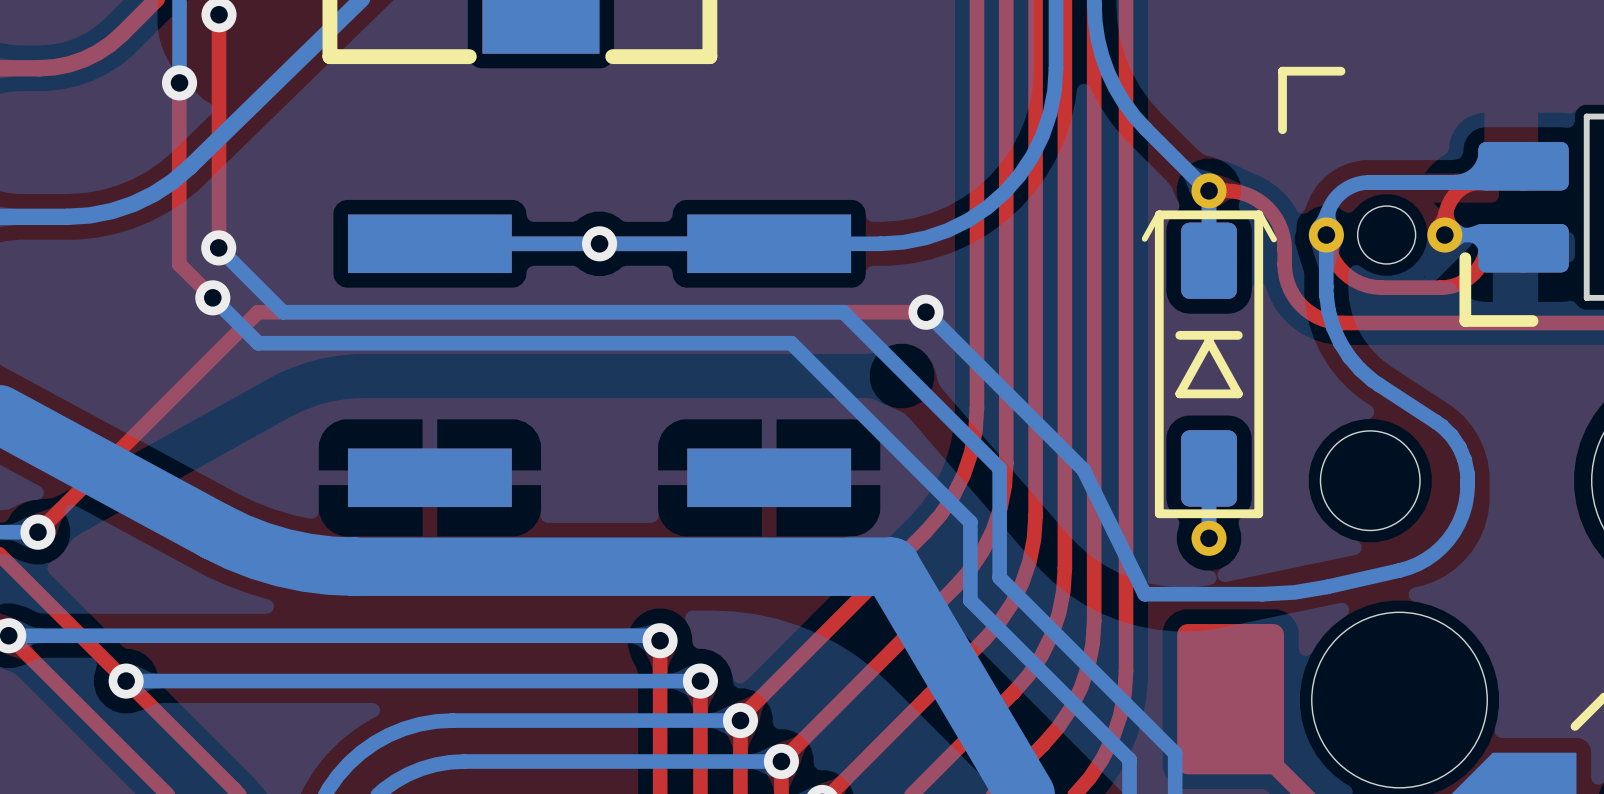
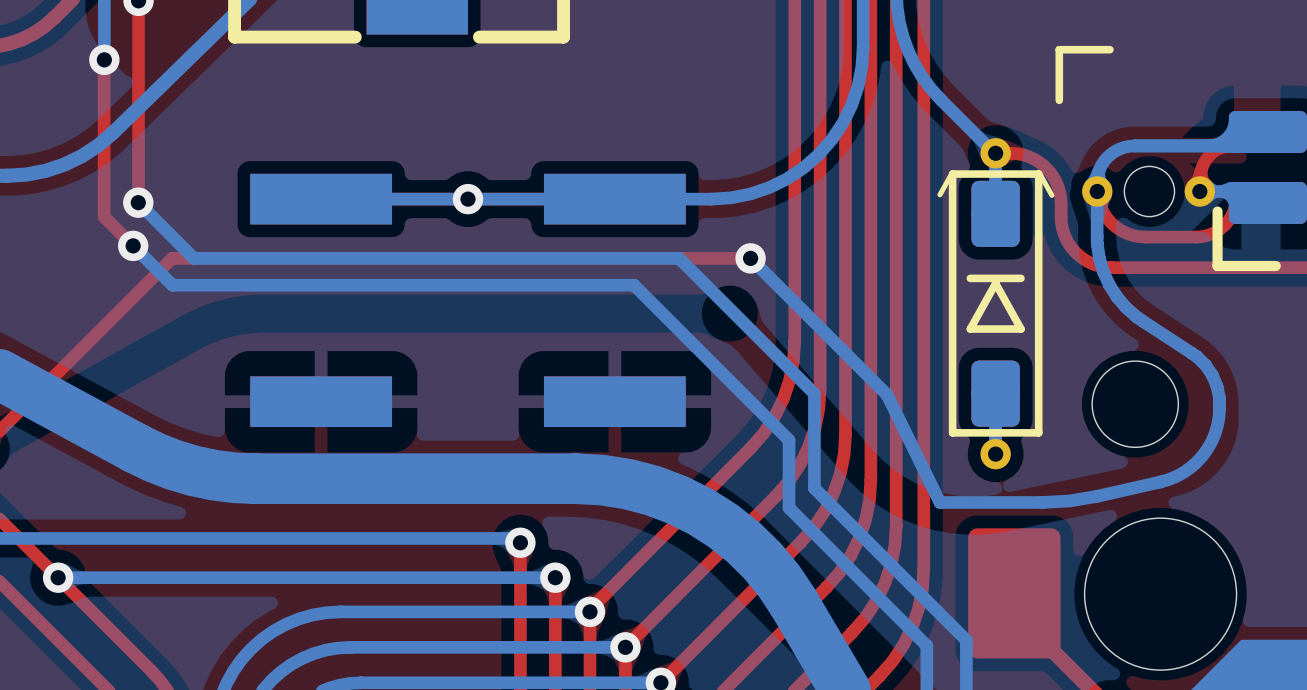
bottom track: (723, 566) (890, 566) (975, 710) -> (575, 478) (627, 484) (653, 490) (701, 511) (743, 542) (779, 581) (793, 603)

